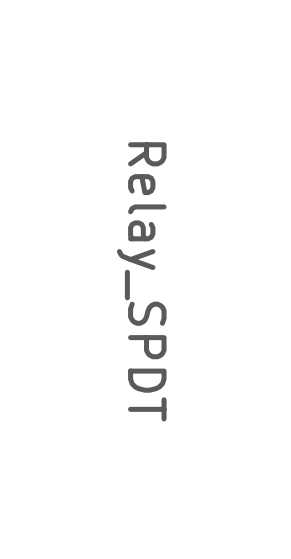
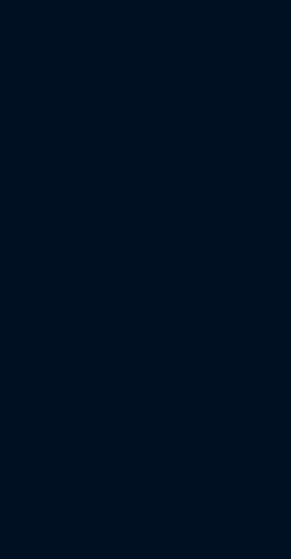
drawing: [116, 142, 167, 422] -> none

